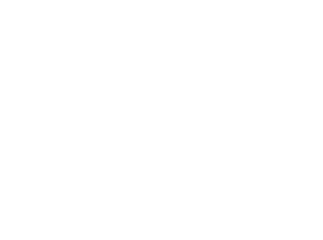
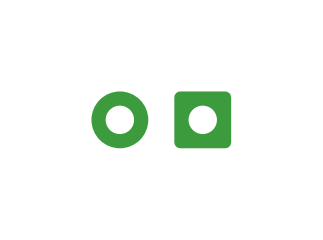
part: none -> (161, 119)

